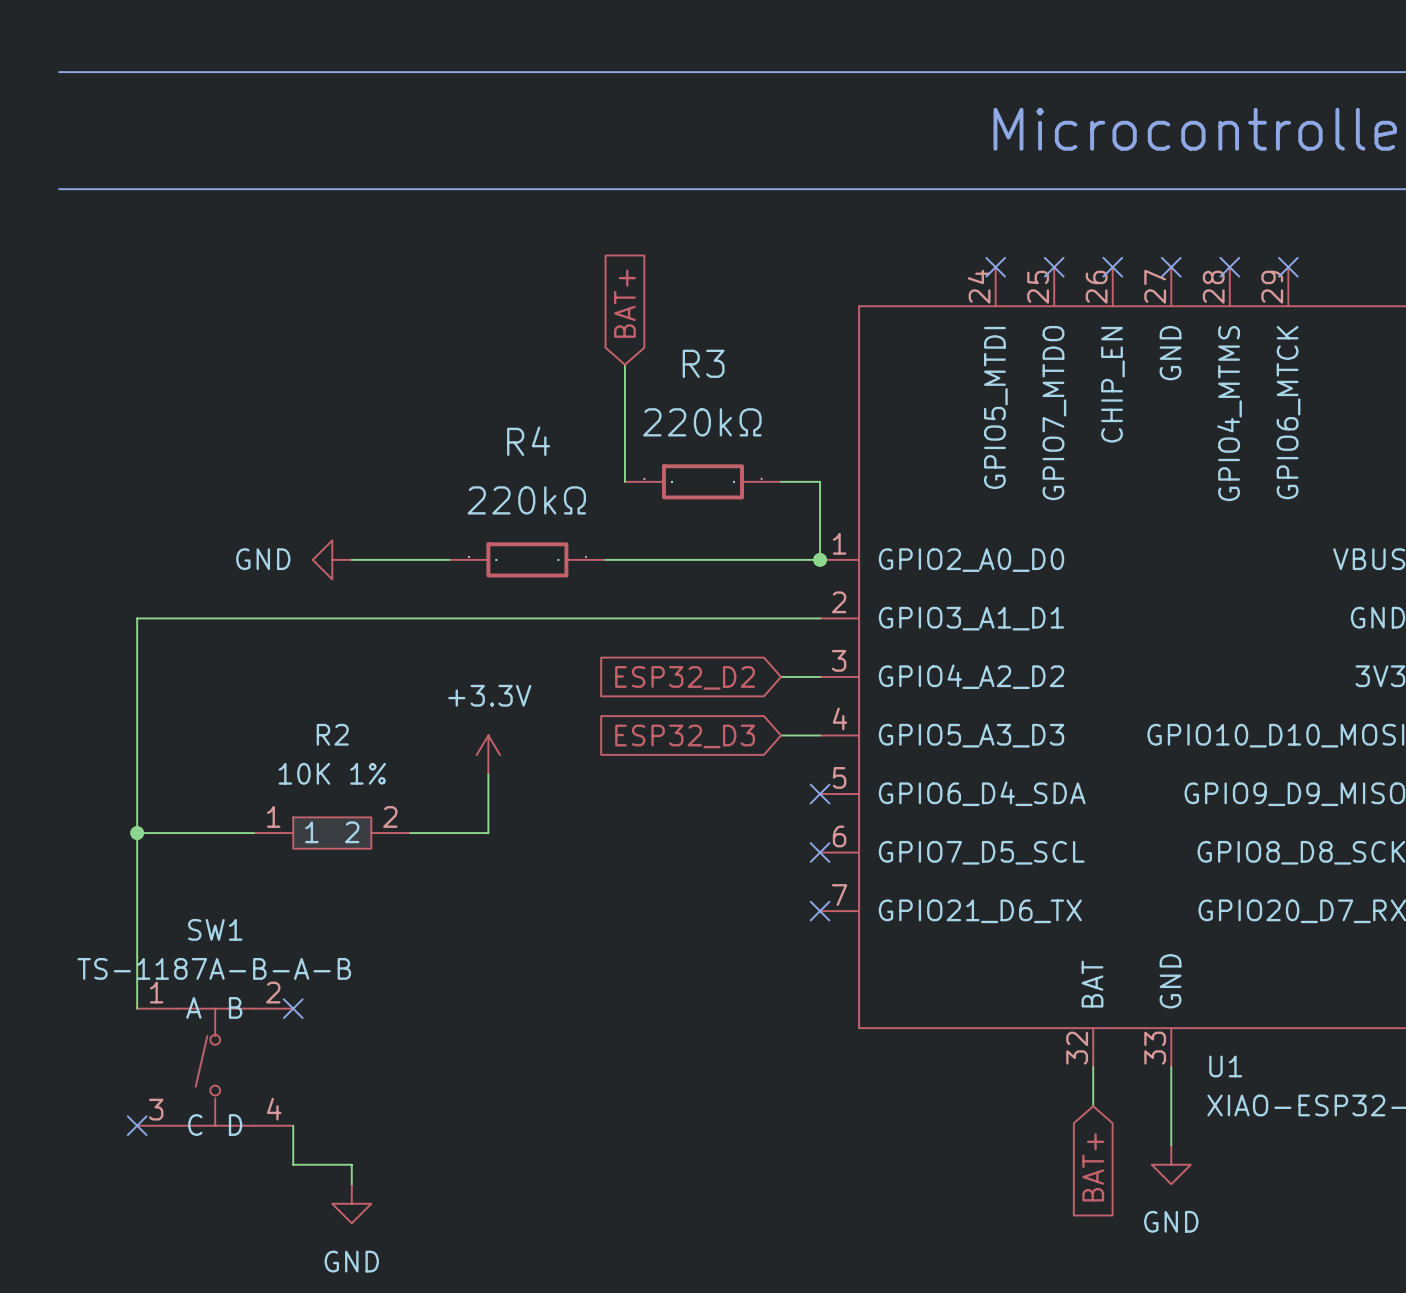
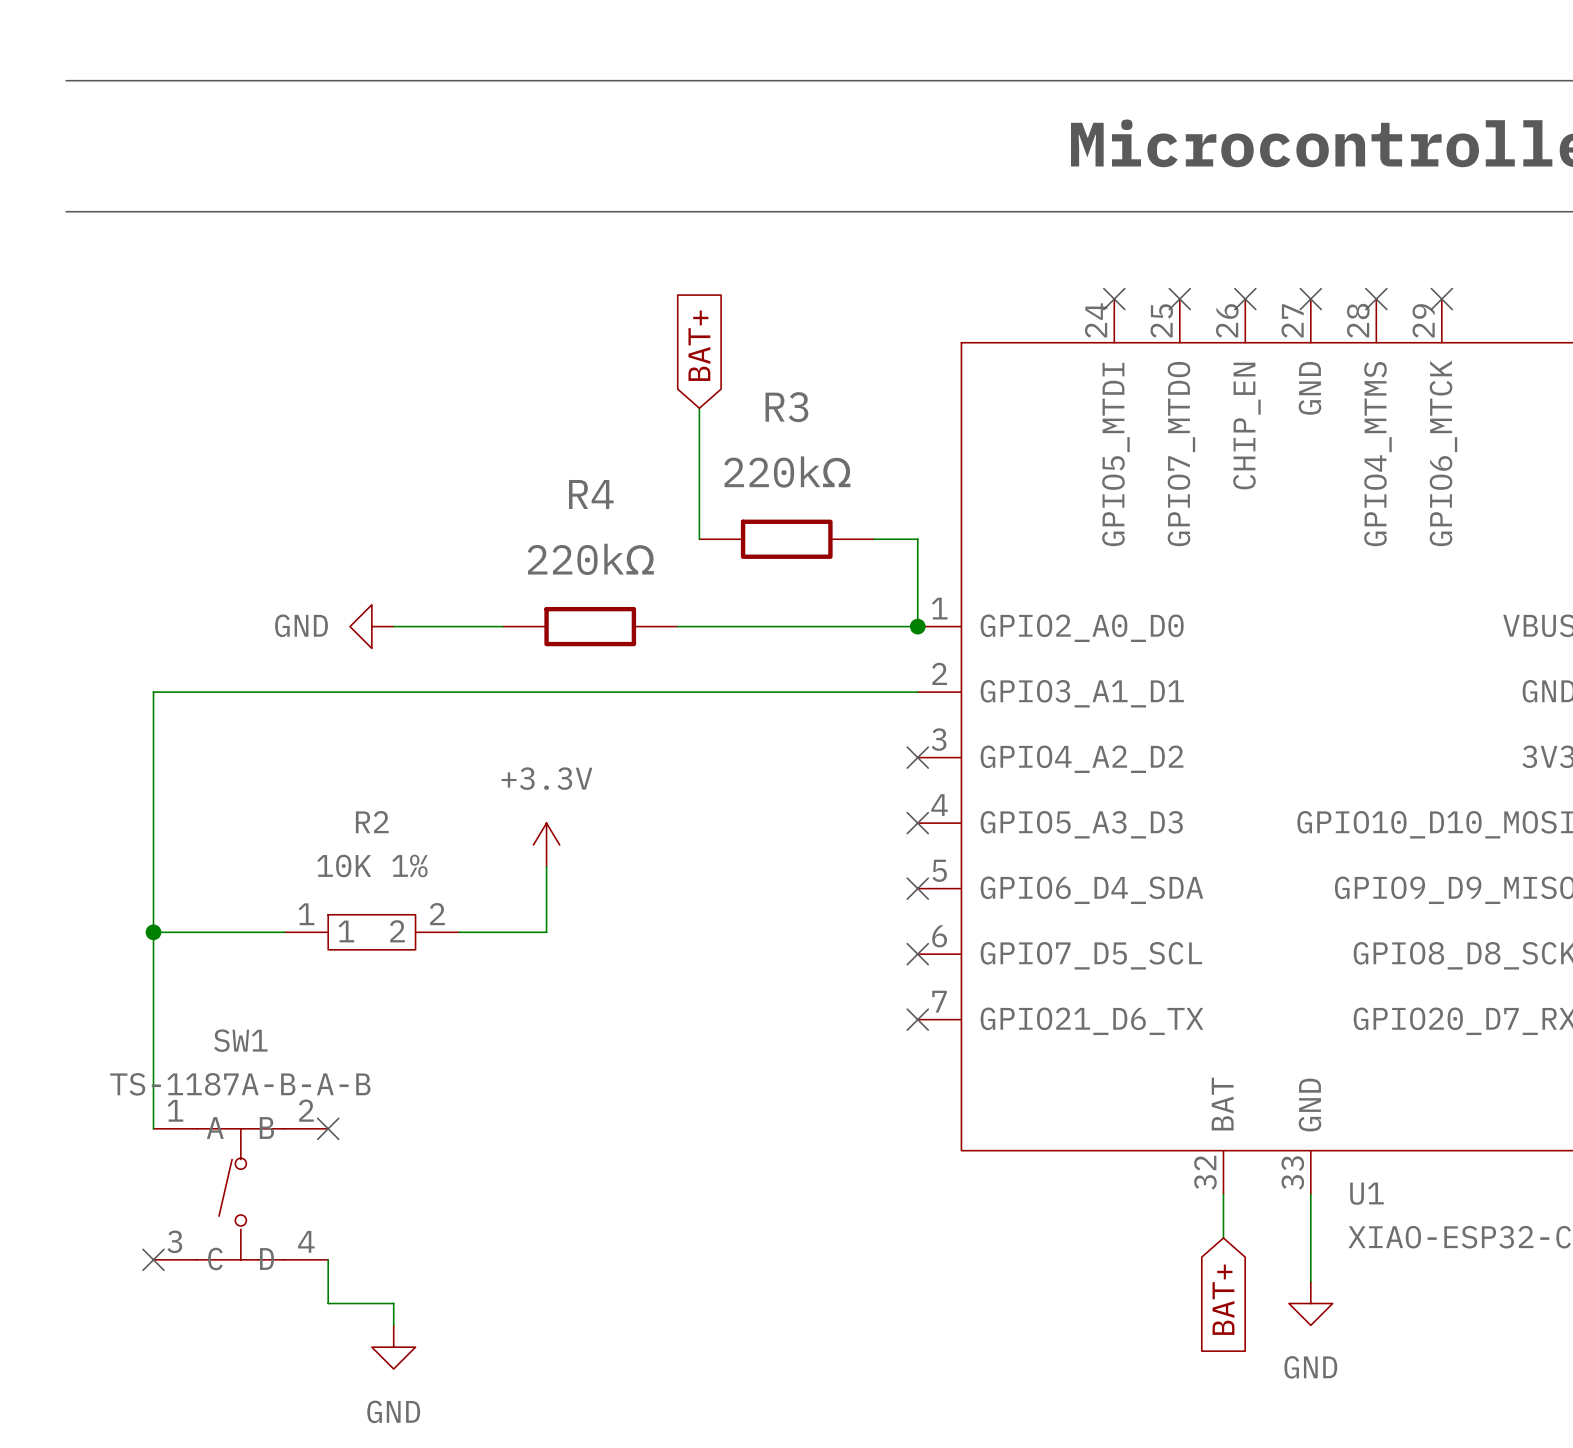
wire: (781, 676) (820, 676) -> none
no-connect mark: none -> (917, 757)
global label: ESP32_D2 (685, 677) -> none
wire: (781, 735) (820, 735) -> none
no-connect mark: none -> (917, 823)
global label: ESP32_D3 (685, 736) -> none

